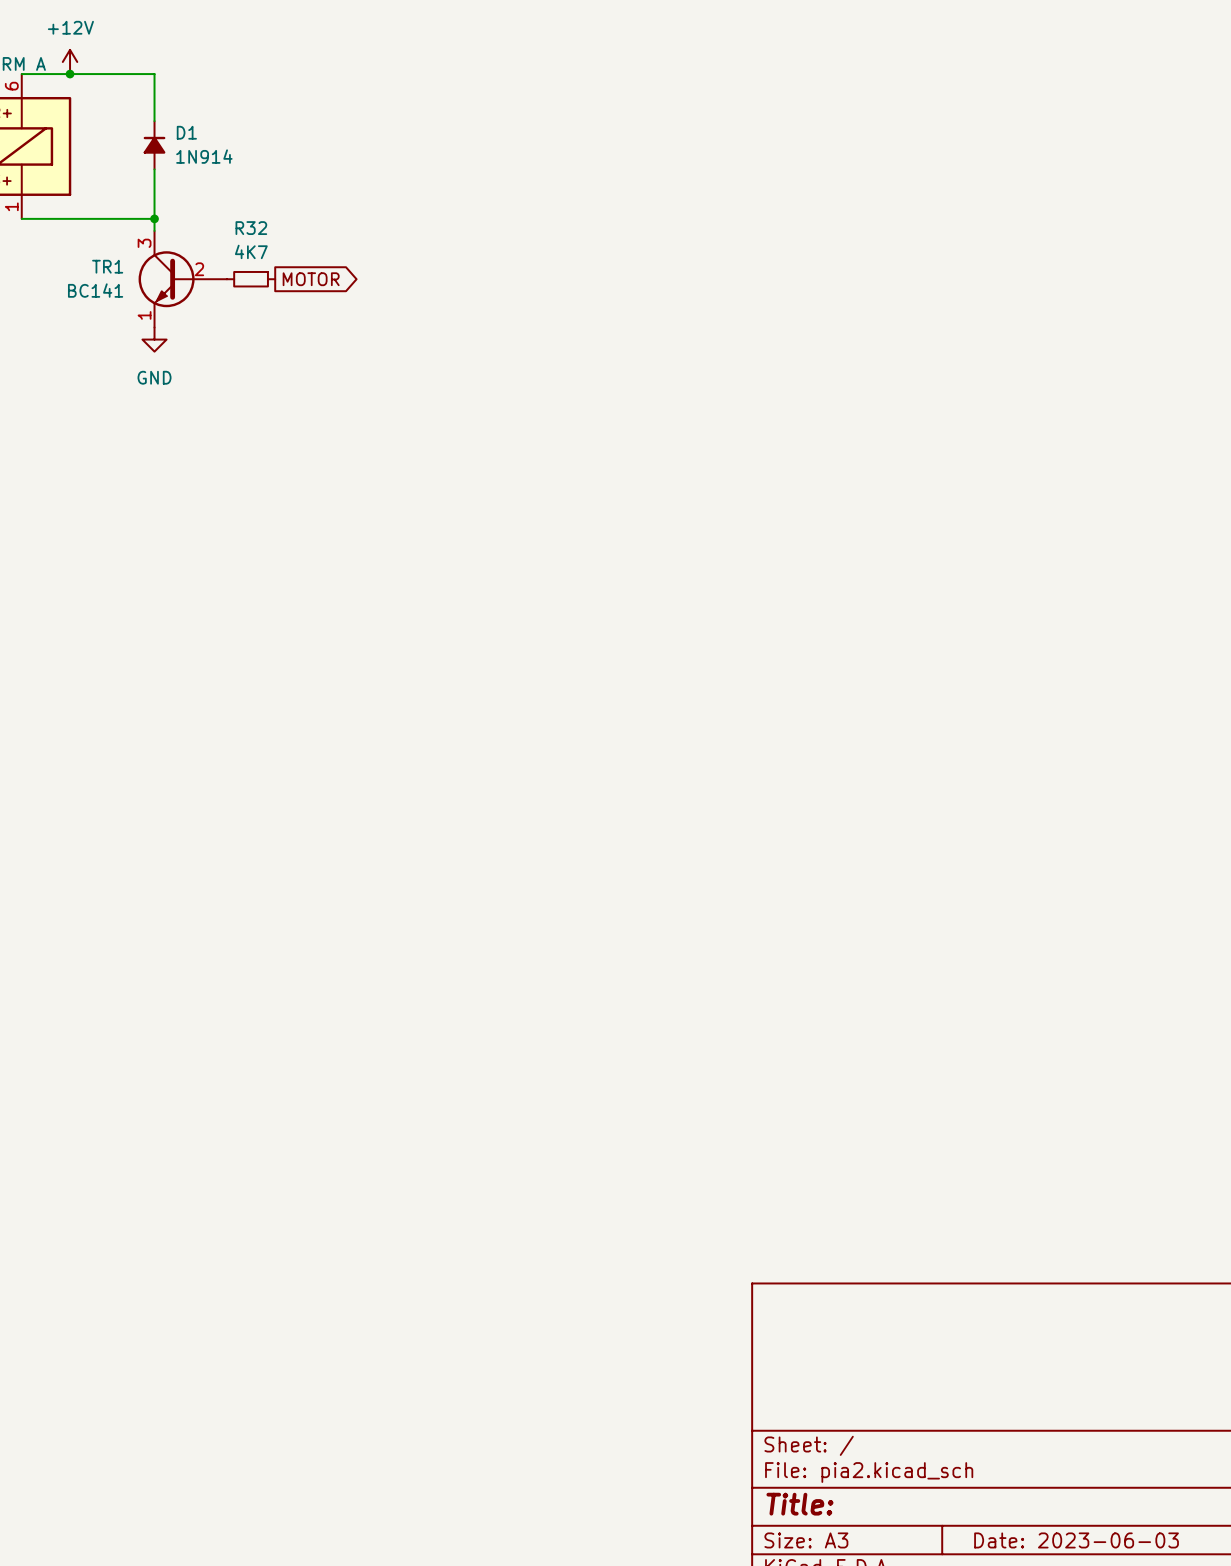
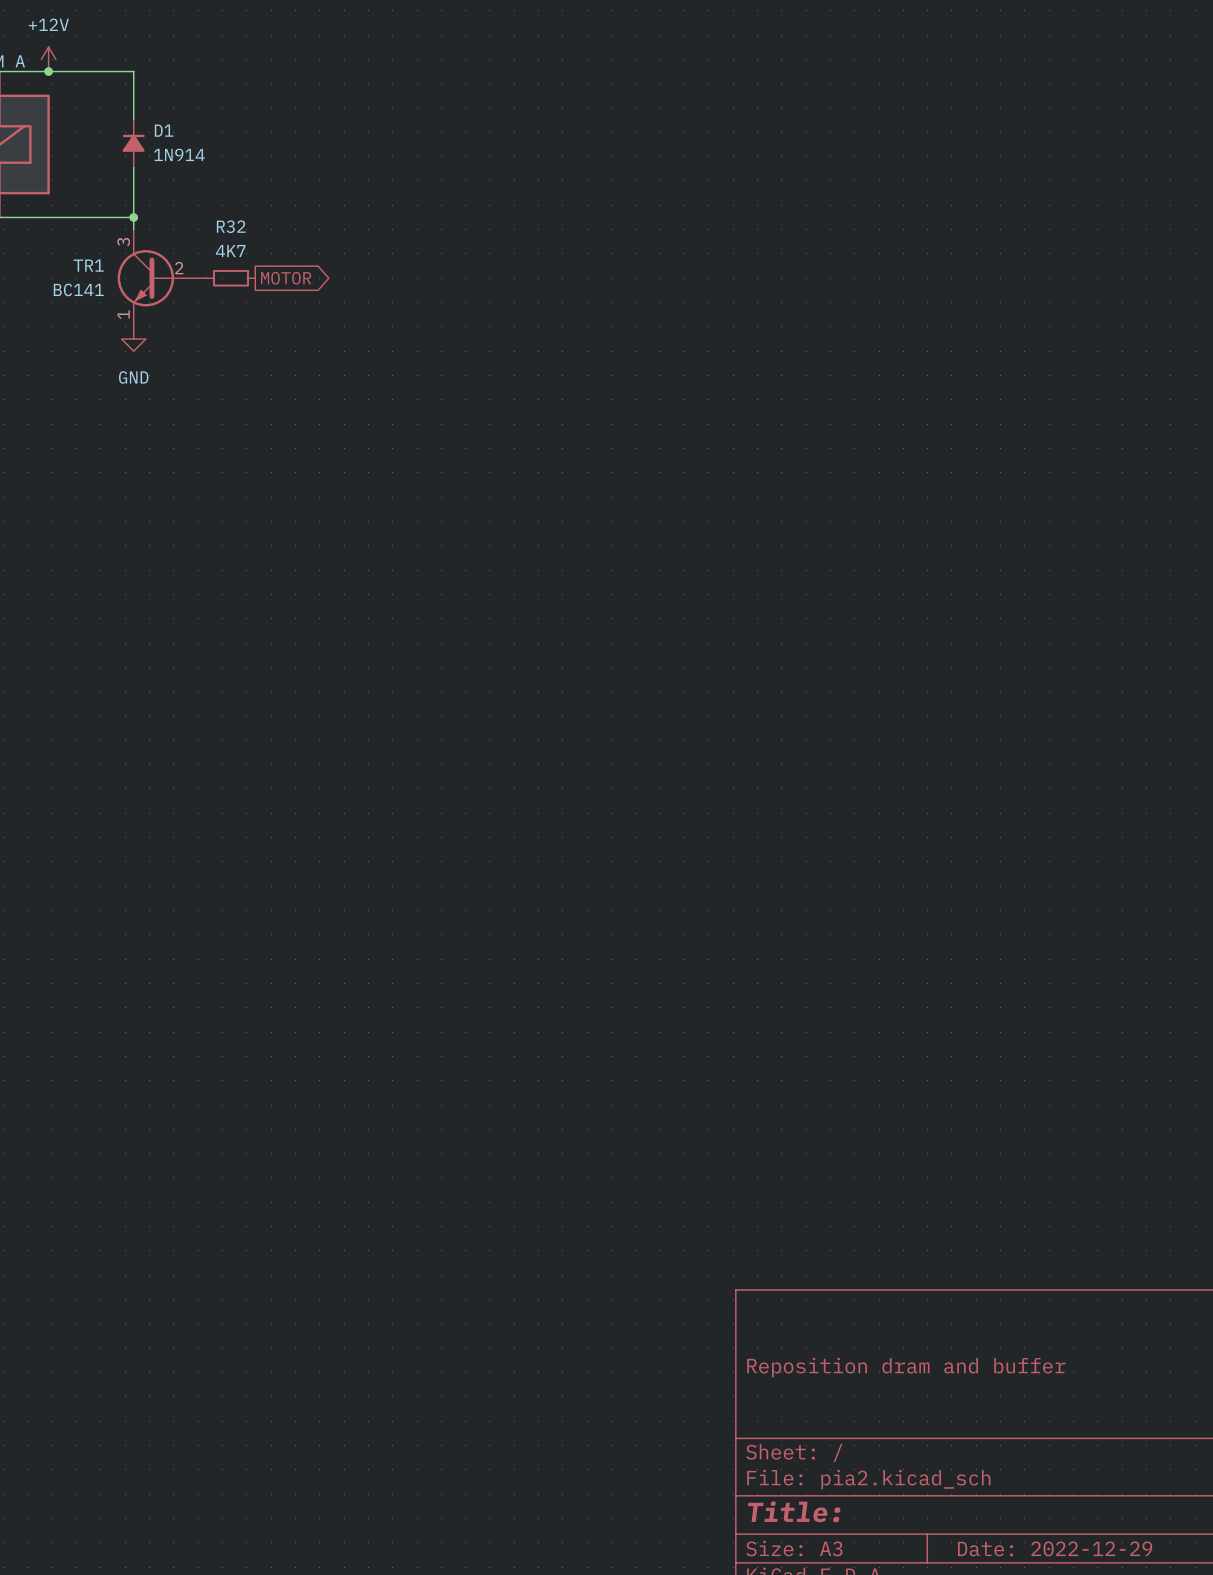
title block: none -> Reposition dram and buffer (906, 1367)
title block: Date: 2023-06-03 (1076, 1540) -> Date: 2022-12-29 (1055, 1548)

